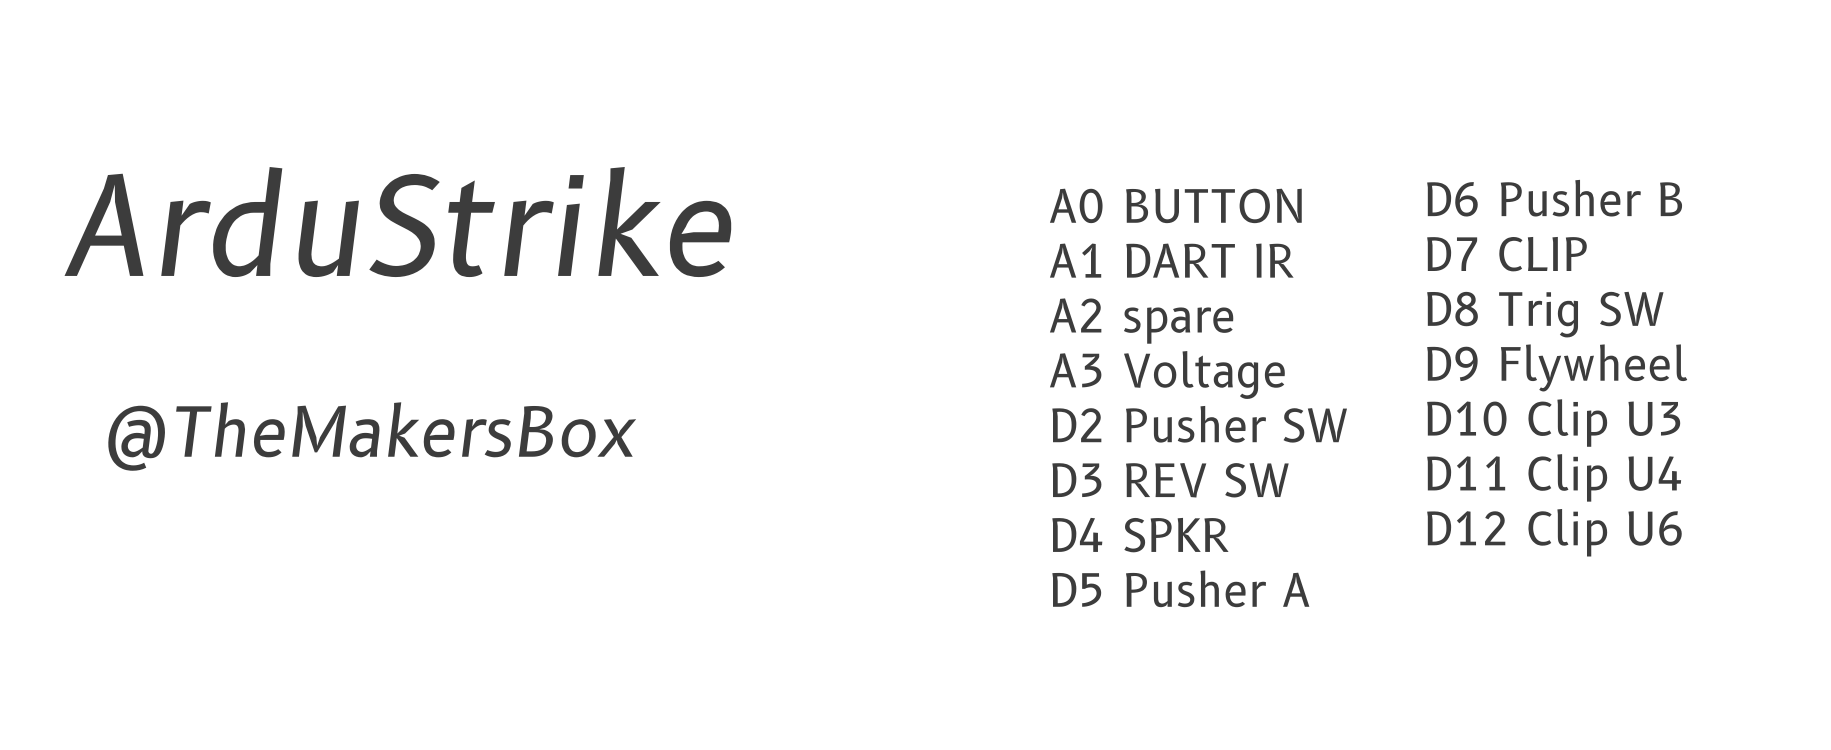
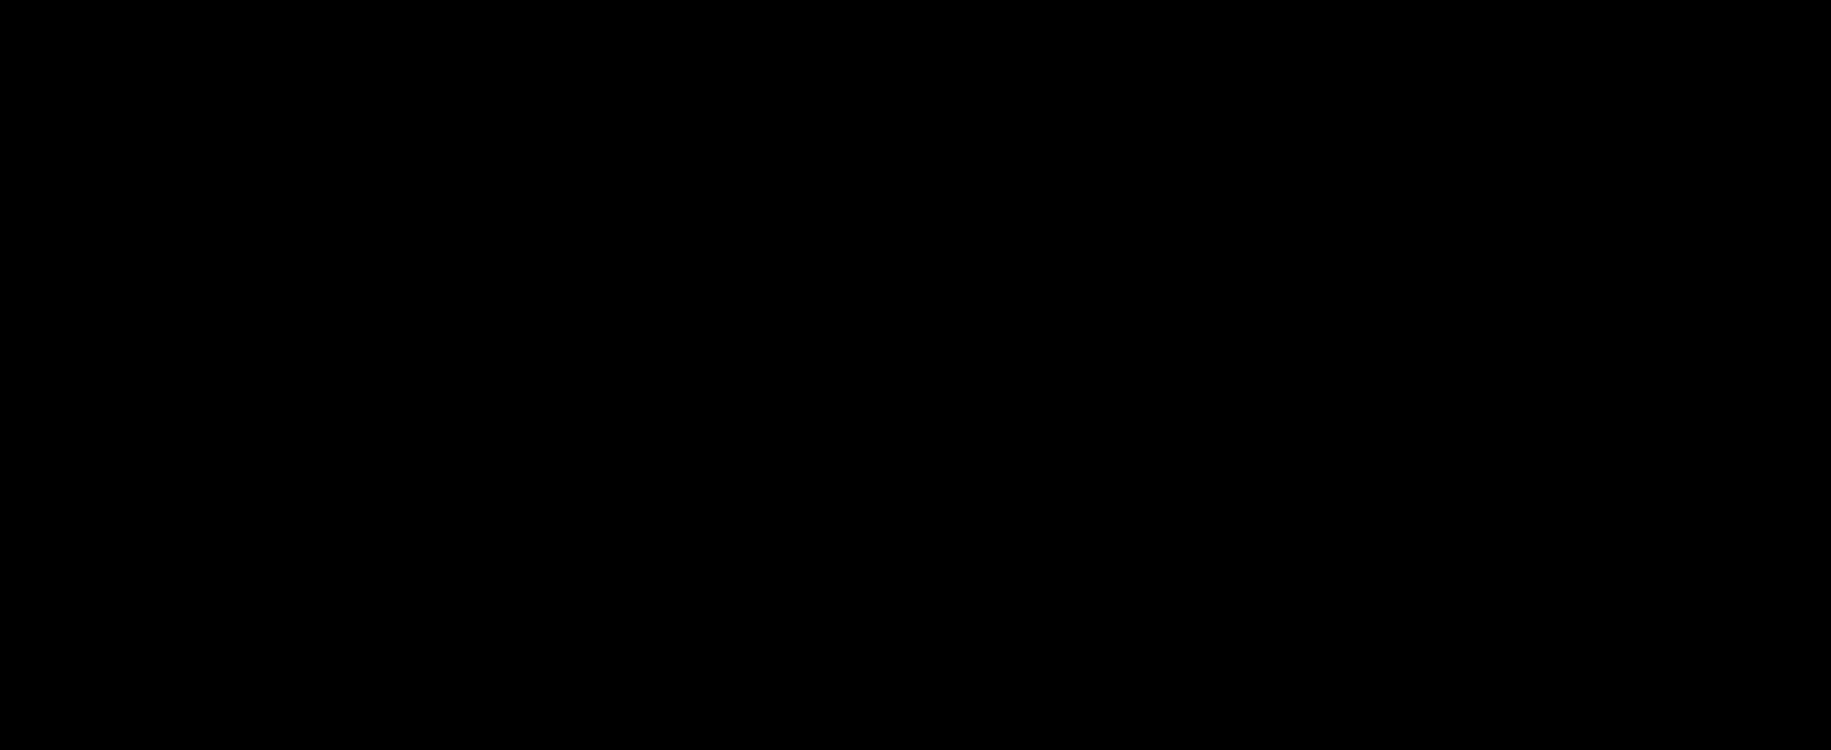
text: D6 Pusher B (1554, 198) -> none
text: A0 BUTTON (1175, 205) -> none
text: ArduStrike (398, 222) -> none
text: D7 CLIP (1506, 254) -> none
text: A1 DART IR (1171, 260) -> none
text: D8 Trig SW (1545, 314) -> none
text: A2 spare (1141, 321) -> none
text: D9 Flywheel (1557, 367) -> none
text: A3 Voltage (1167, 374) -> none
text: D10 Clip U3 (1553, 423) -> none
text: D2 Pusher SW (1199, 424) -> none
text: @TheMakersBox (372, 436) -> none
text: D11 Clip U4 (1554, 477) -> none
text: D3 REV SW (1170, 480) -> none
text: D12 Clip U6 (1554, 532) -> none
text: D4 SPKR (1140, 535) -> none
text: D5 Pusher A (1180, 588) -> none

